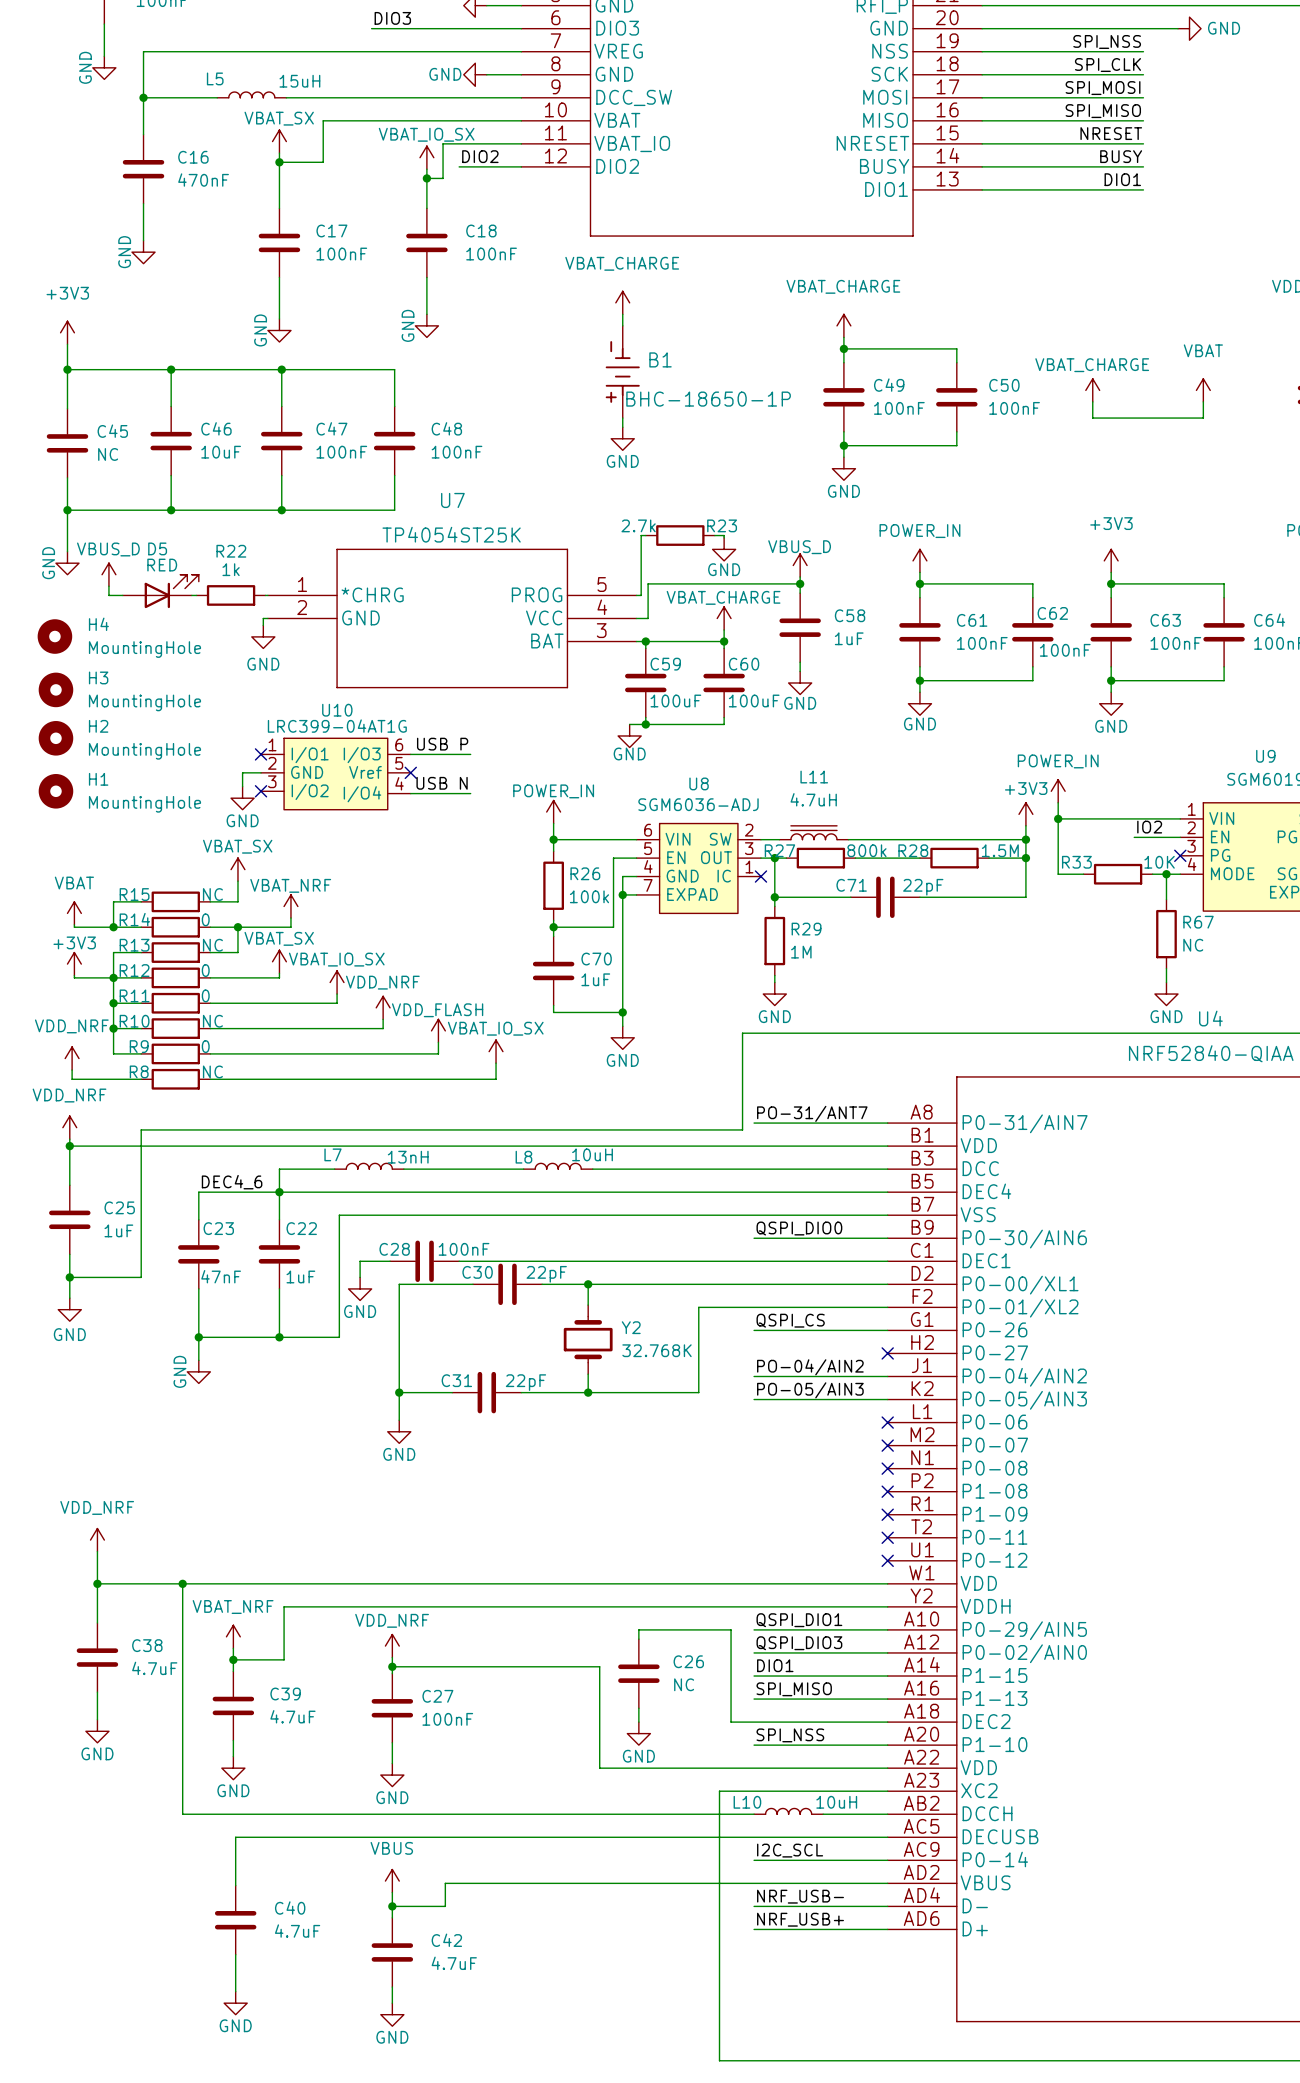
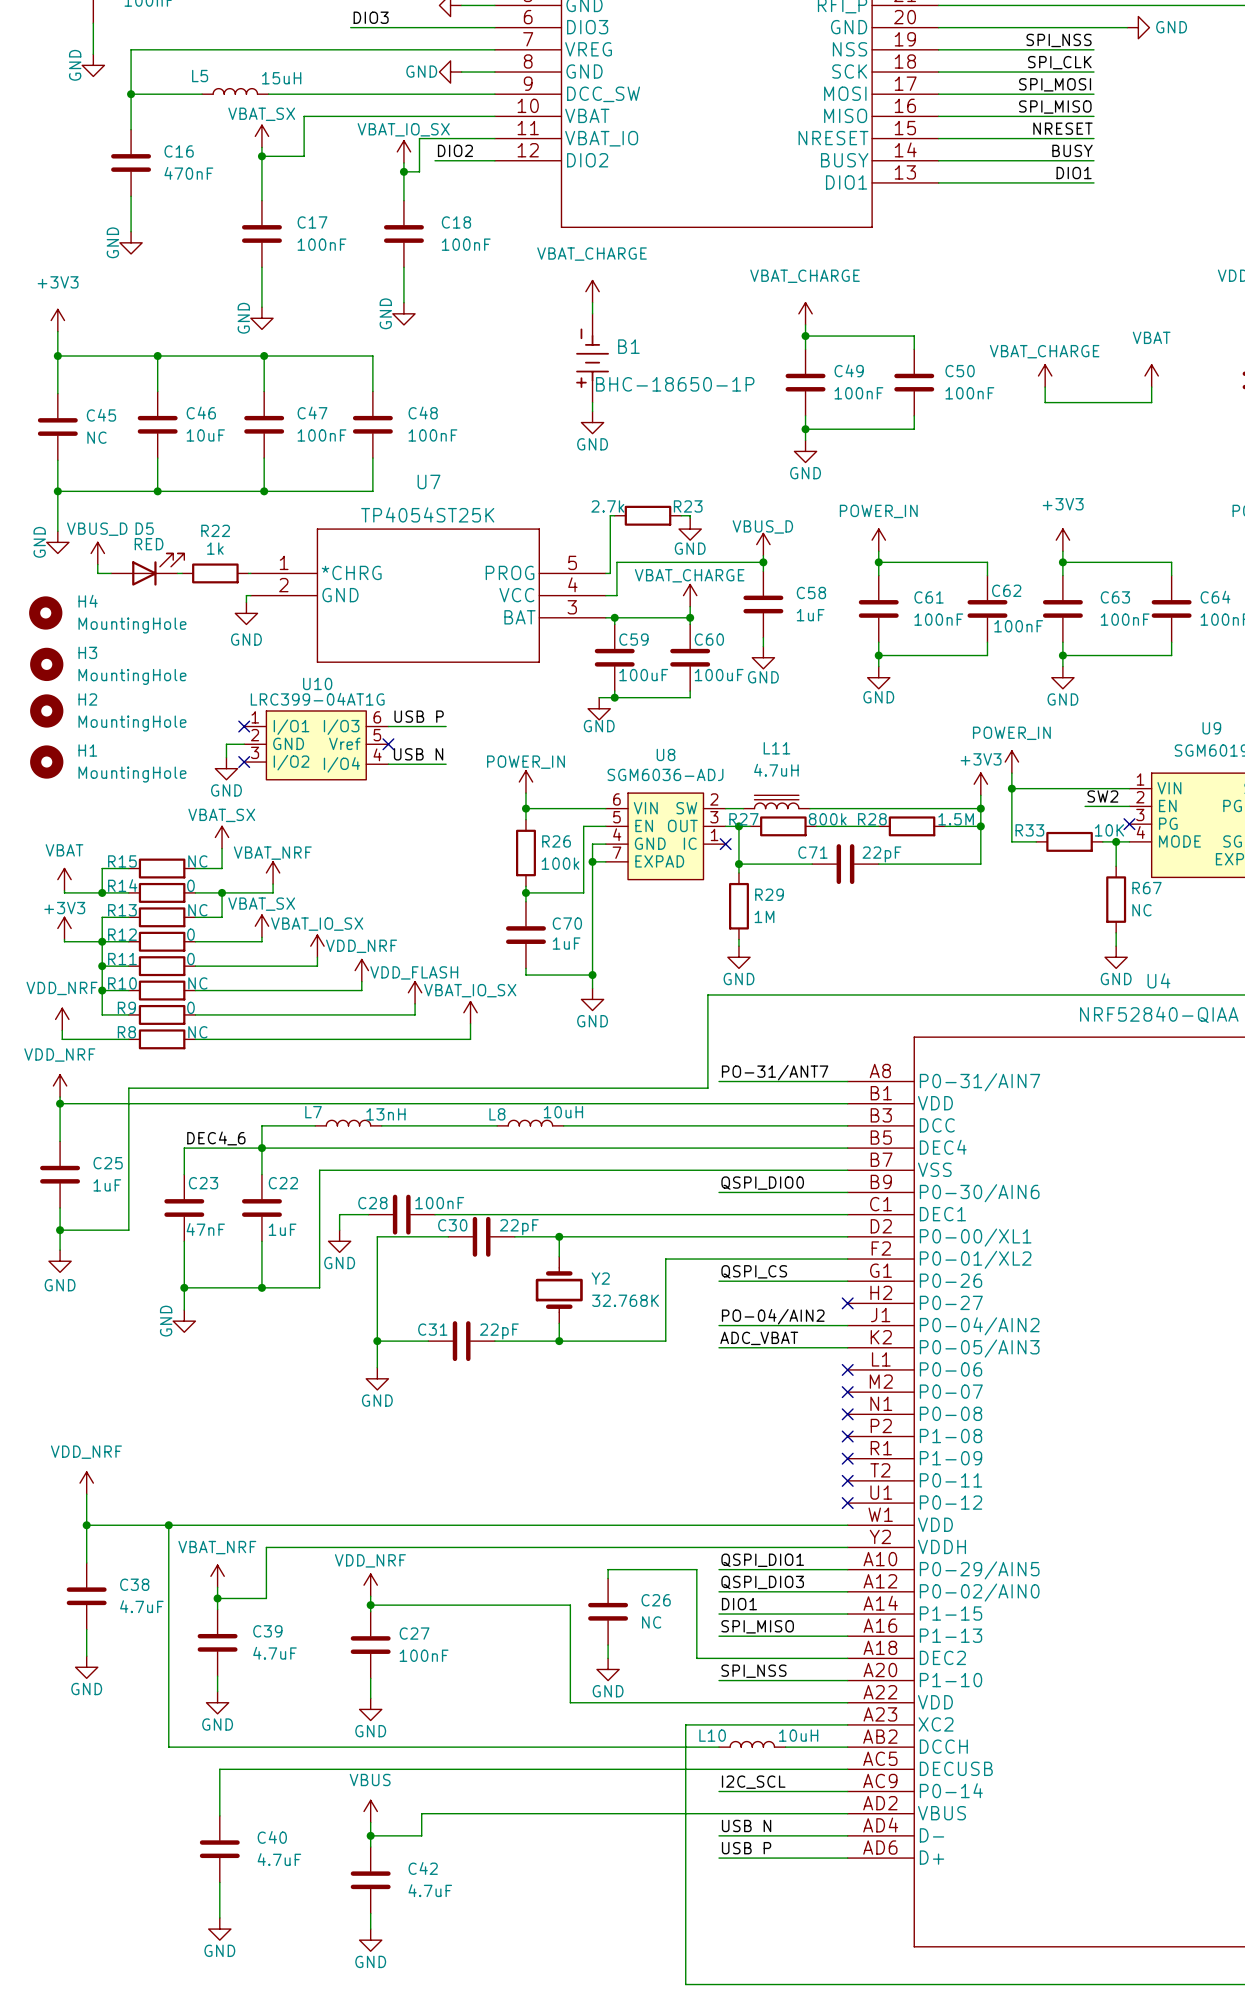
label: IO2 (1149, 827) -> SW2 (1102, 796)
label: PO-05/AIN3 (810, 1390) -> ADC_VBAT (759, 1338)
label: NRF_USB- (800, 1896) -> USB N (746, 1825)
label: NRF_USB+ (800, 1919) -> USB P (746, 1848)

